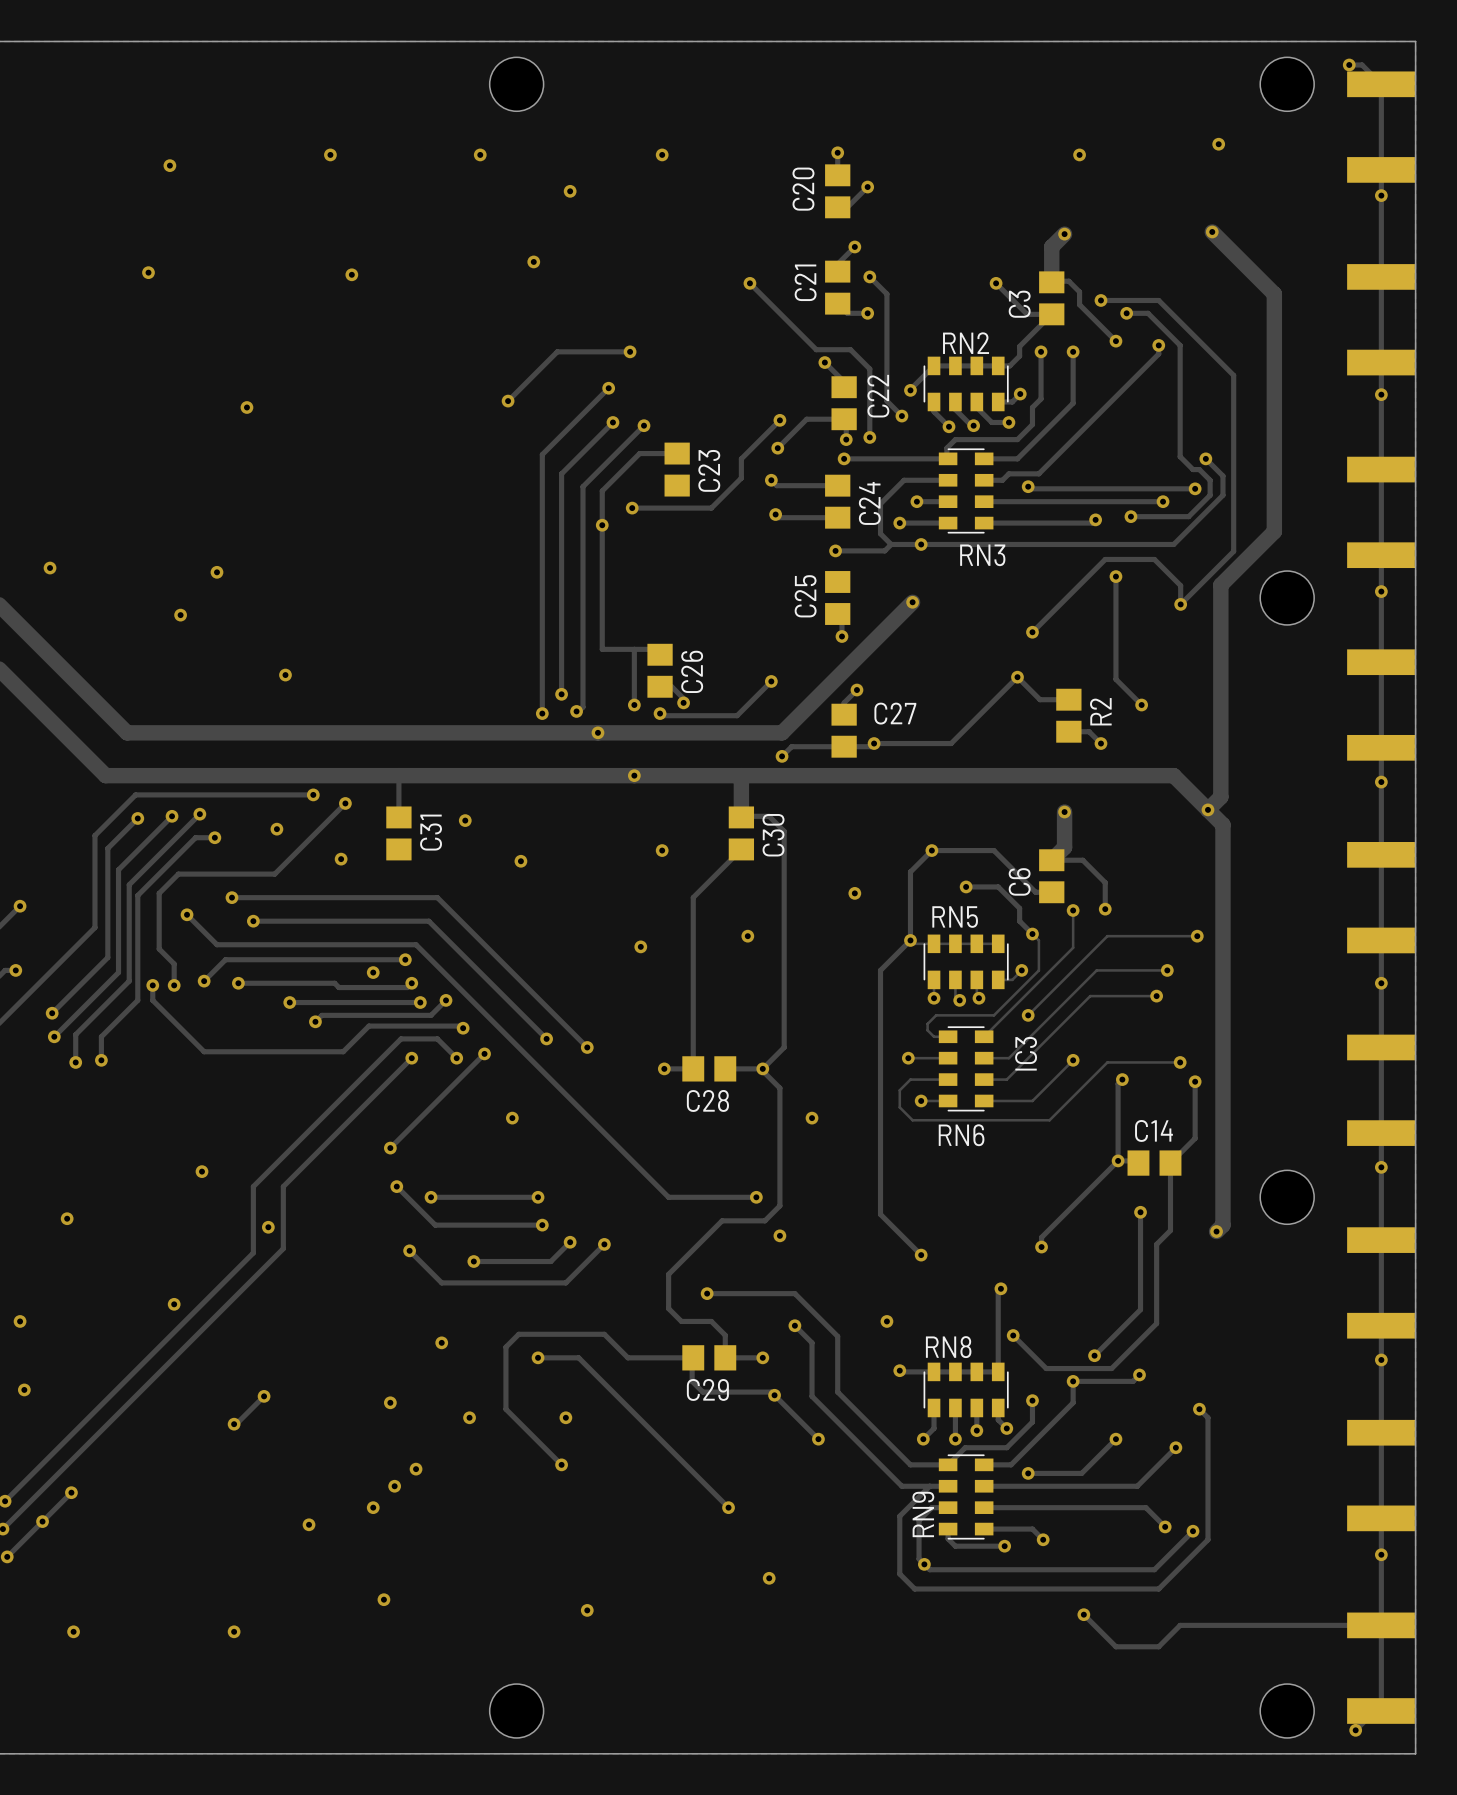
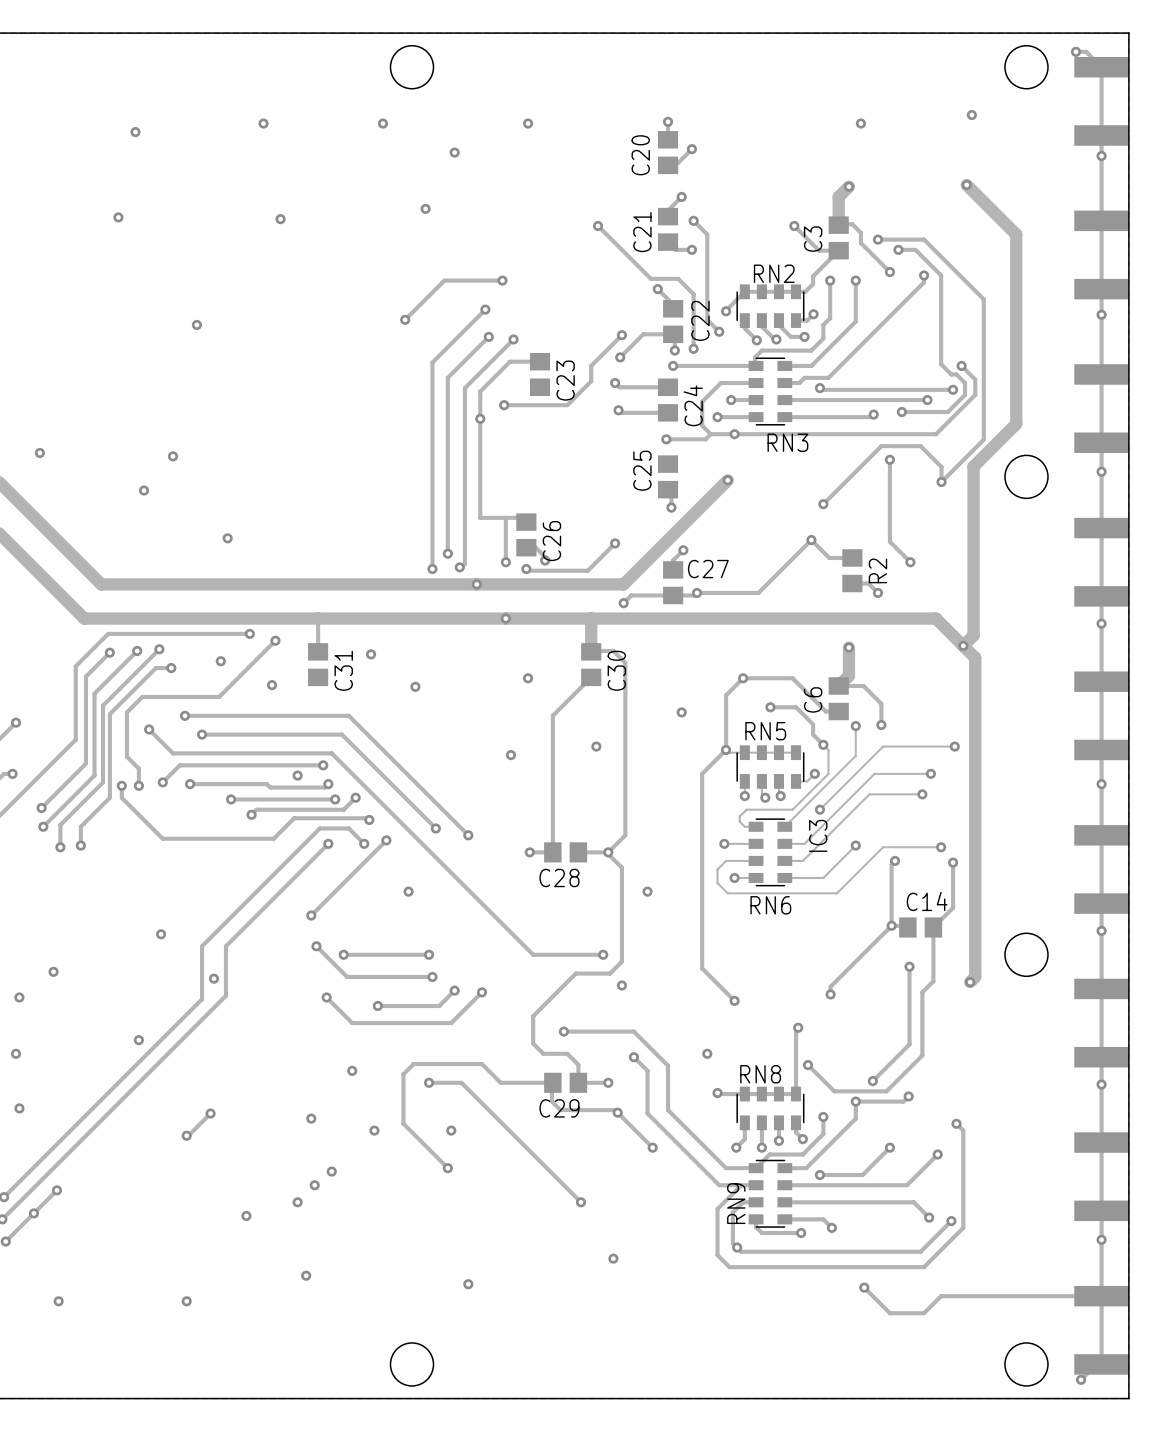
via: none -> (19, 997)

